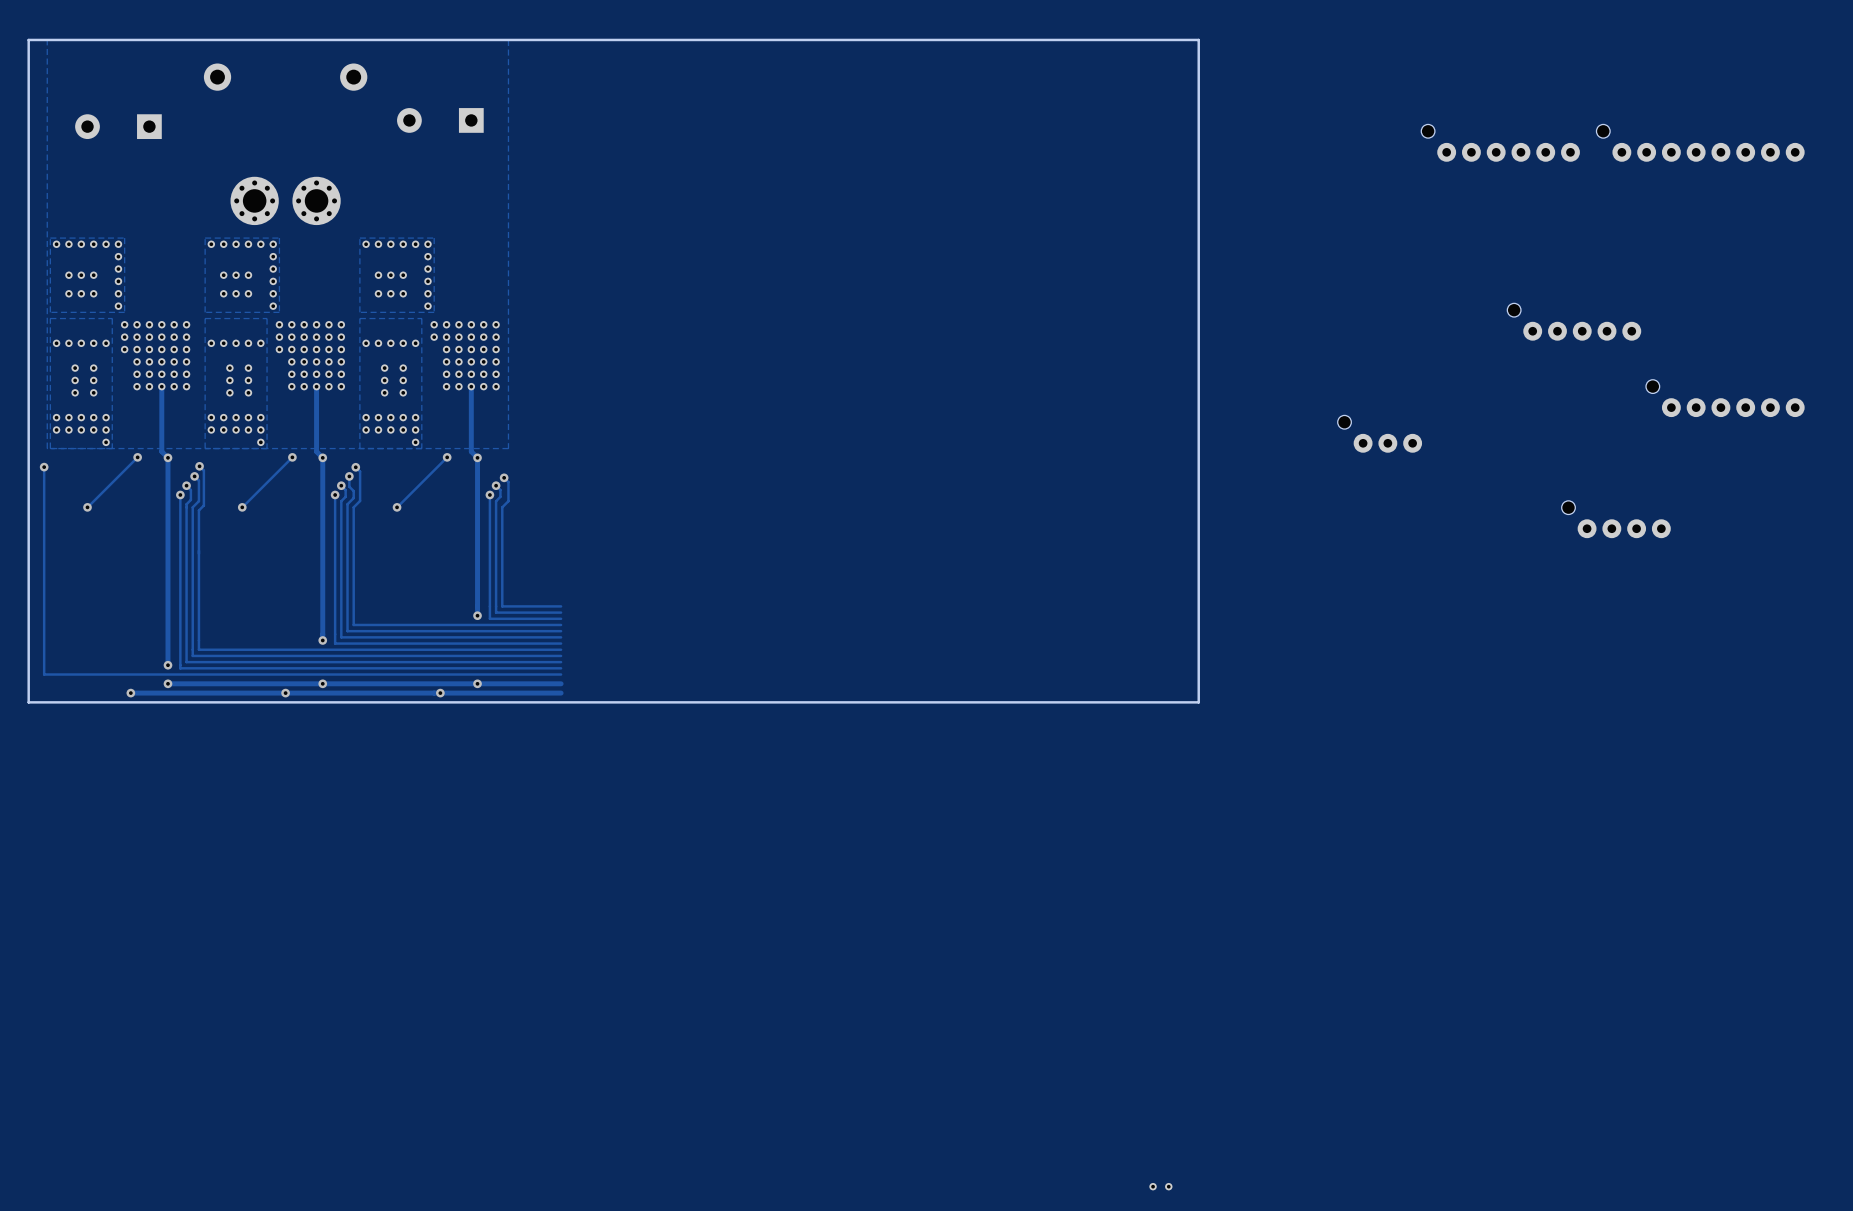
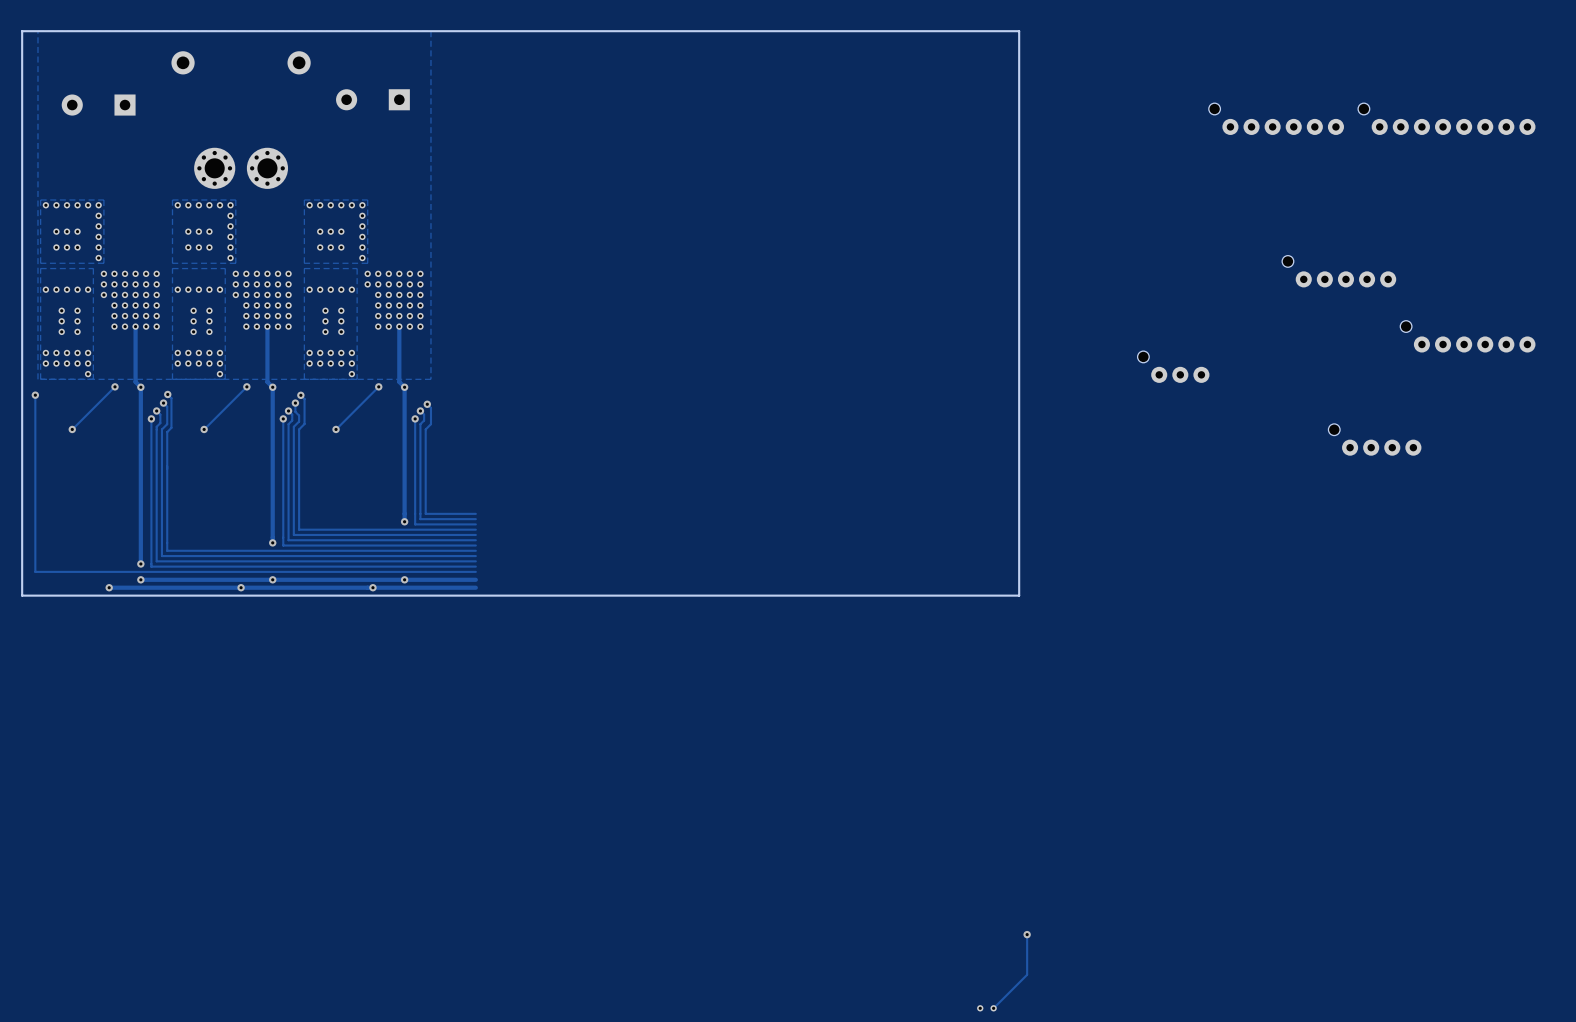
track: none -> (1027, 934) (1027, 974) (993, 1008)
via: none -> (1027, 934)

